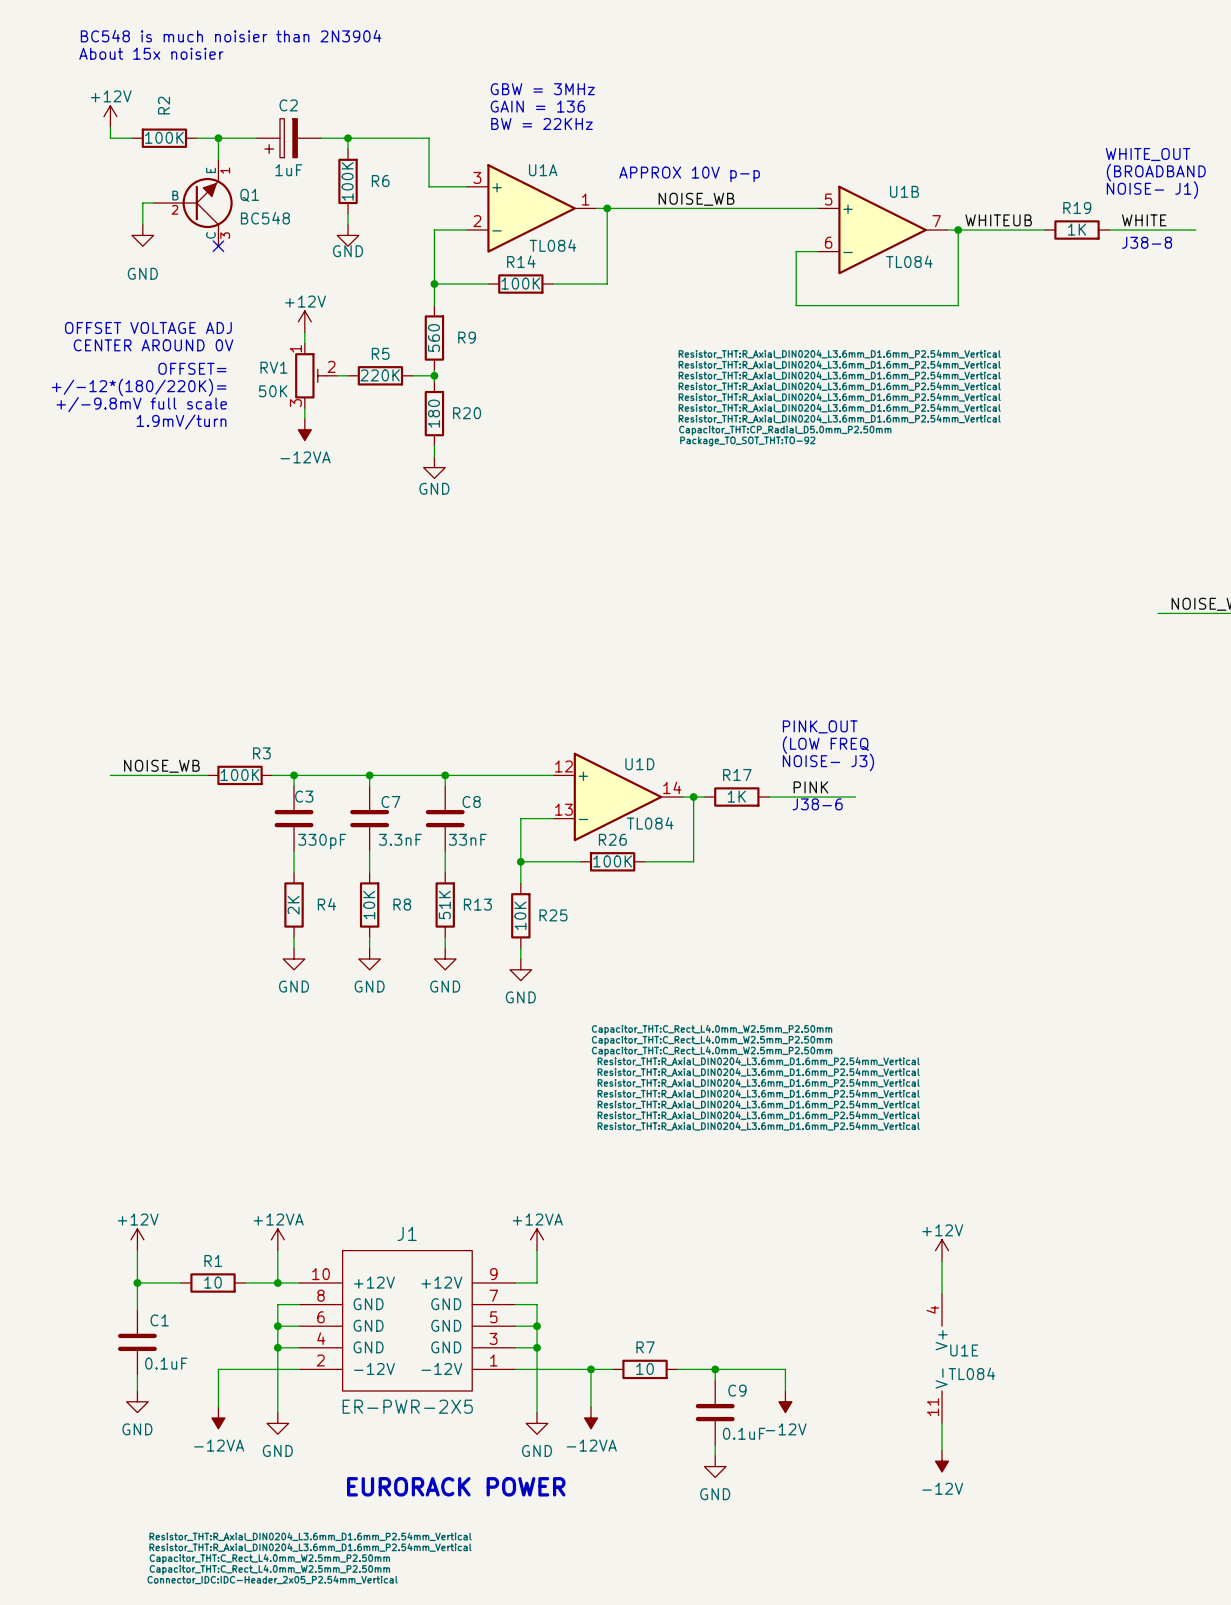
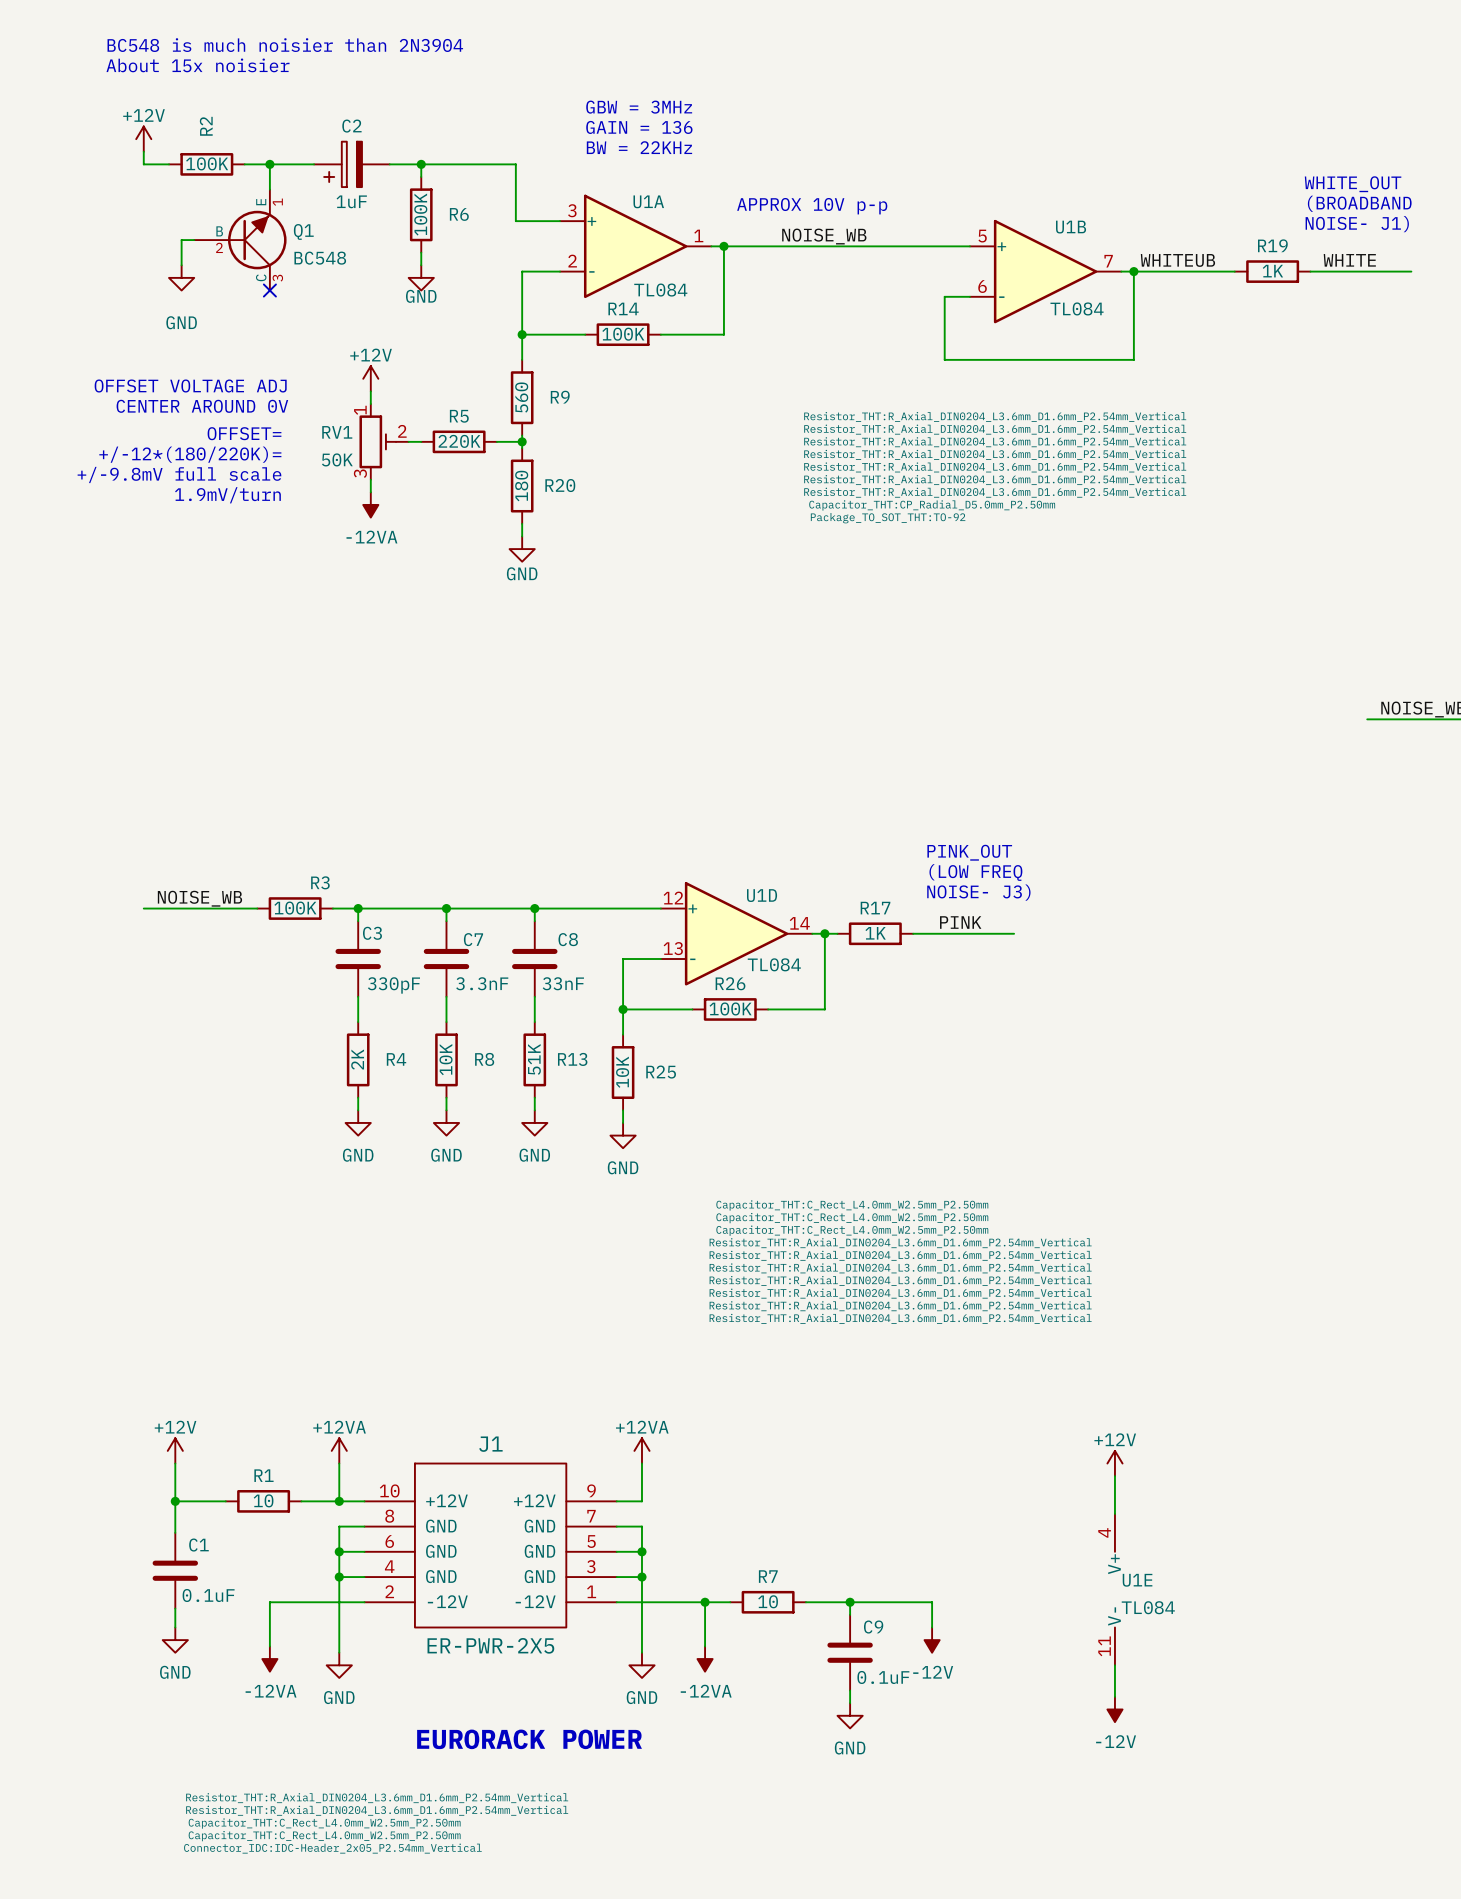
text: J38-8 (1147, 242) -> none
text: J38-6 (817, 804) -> none

